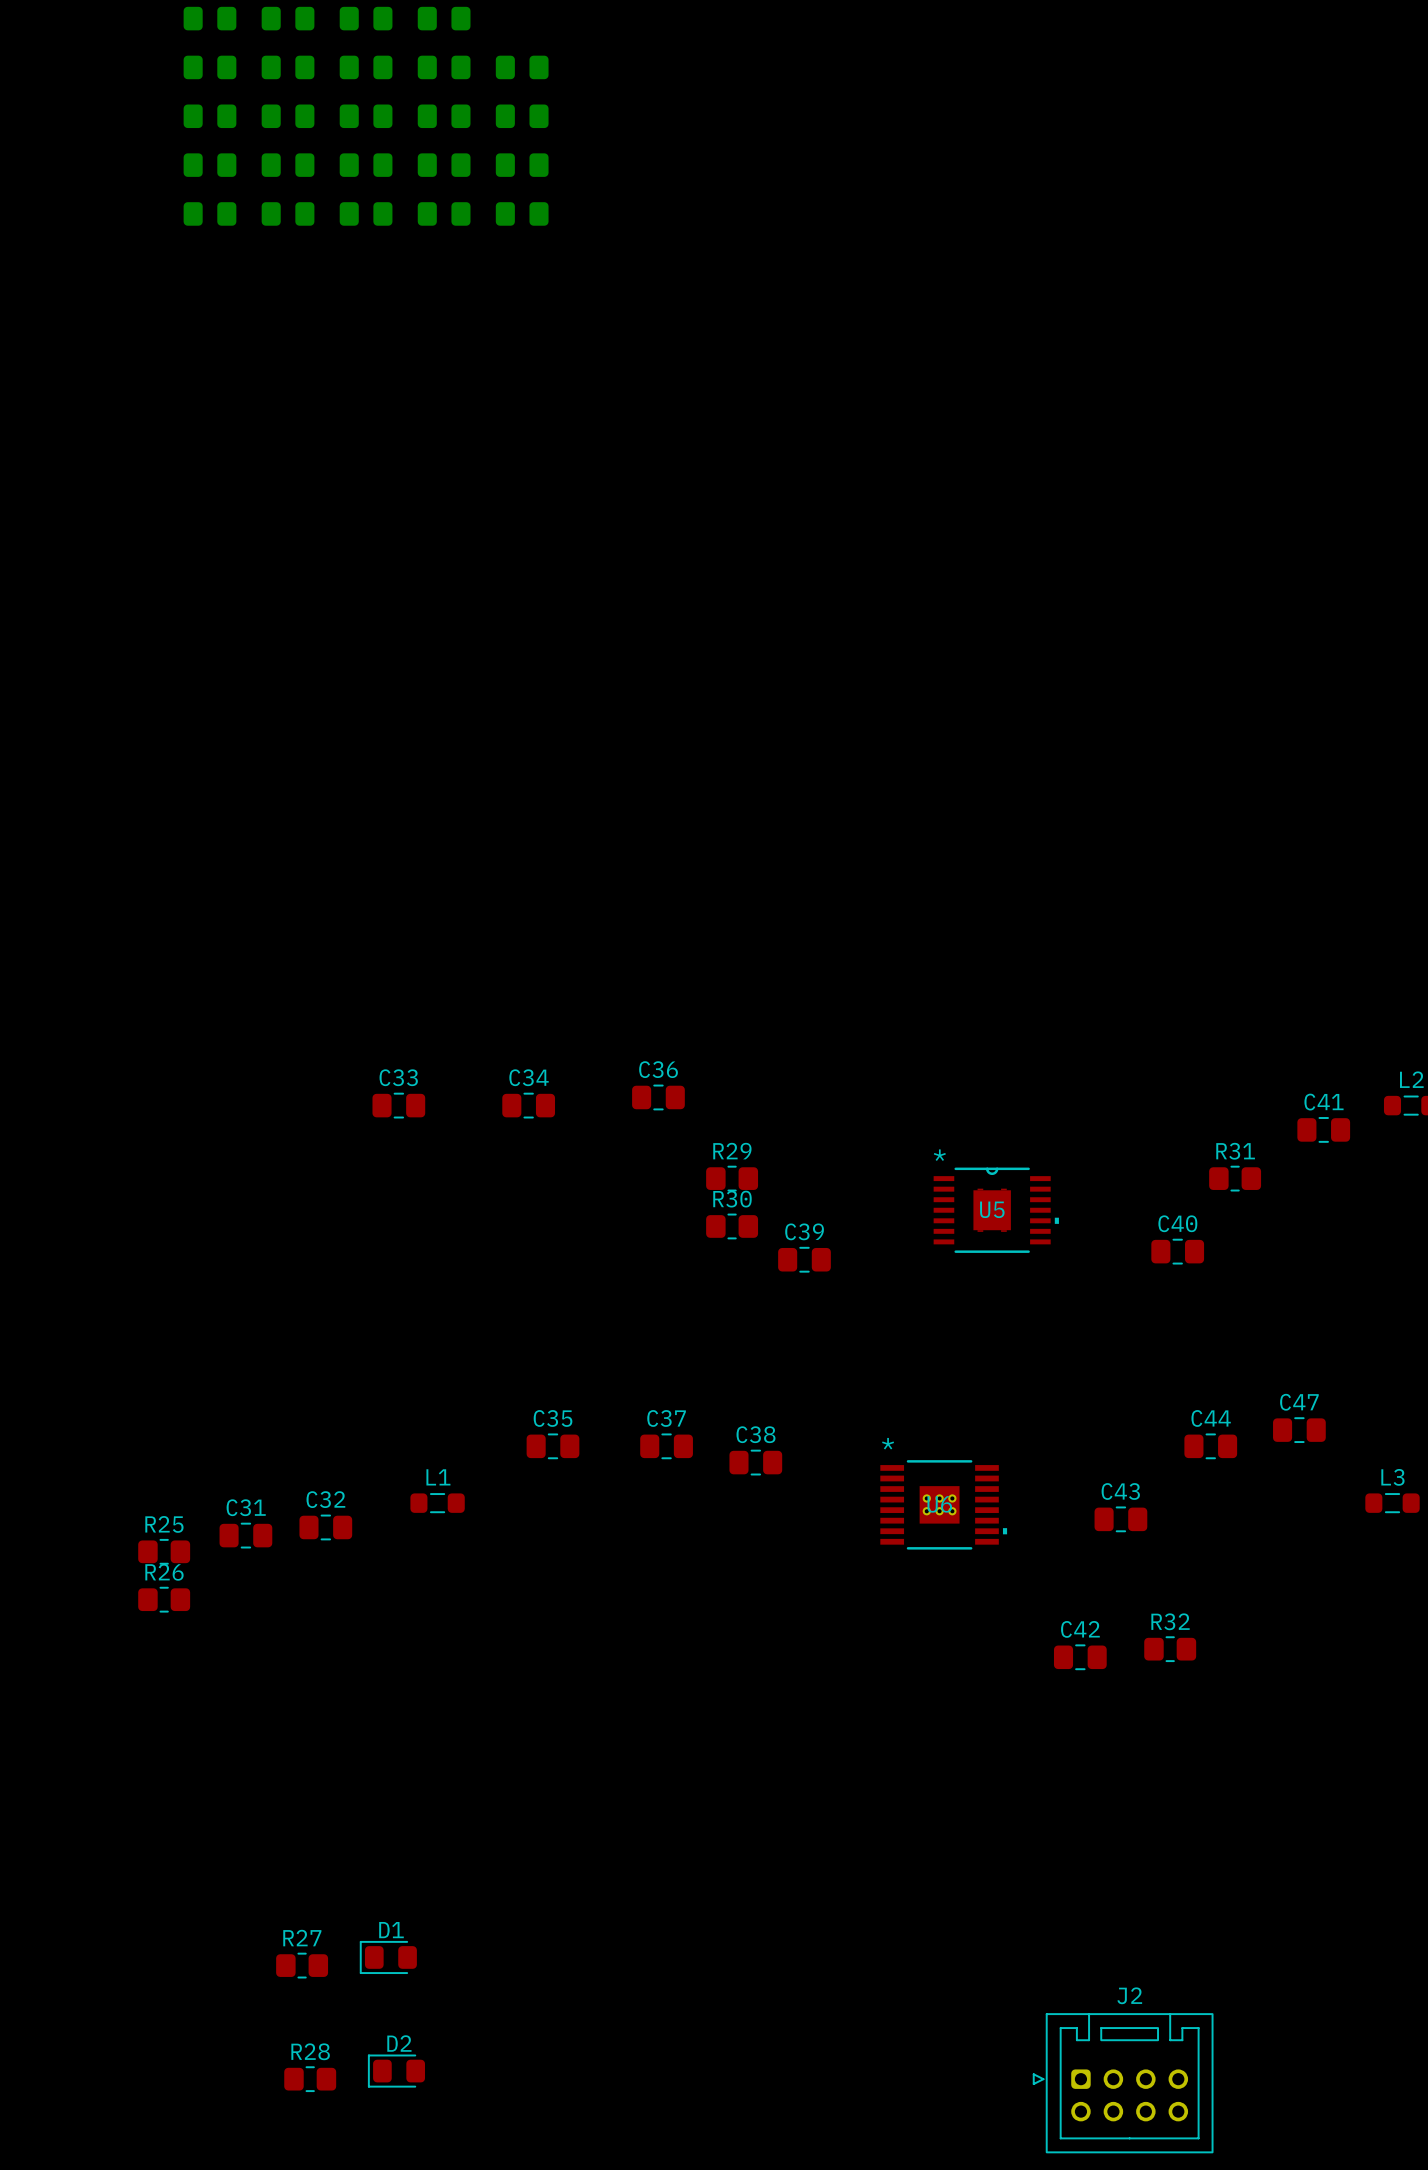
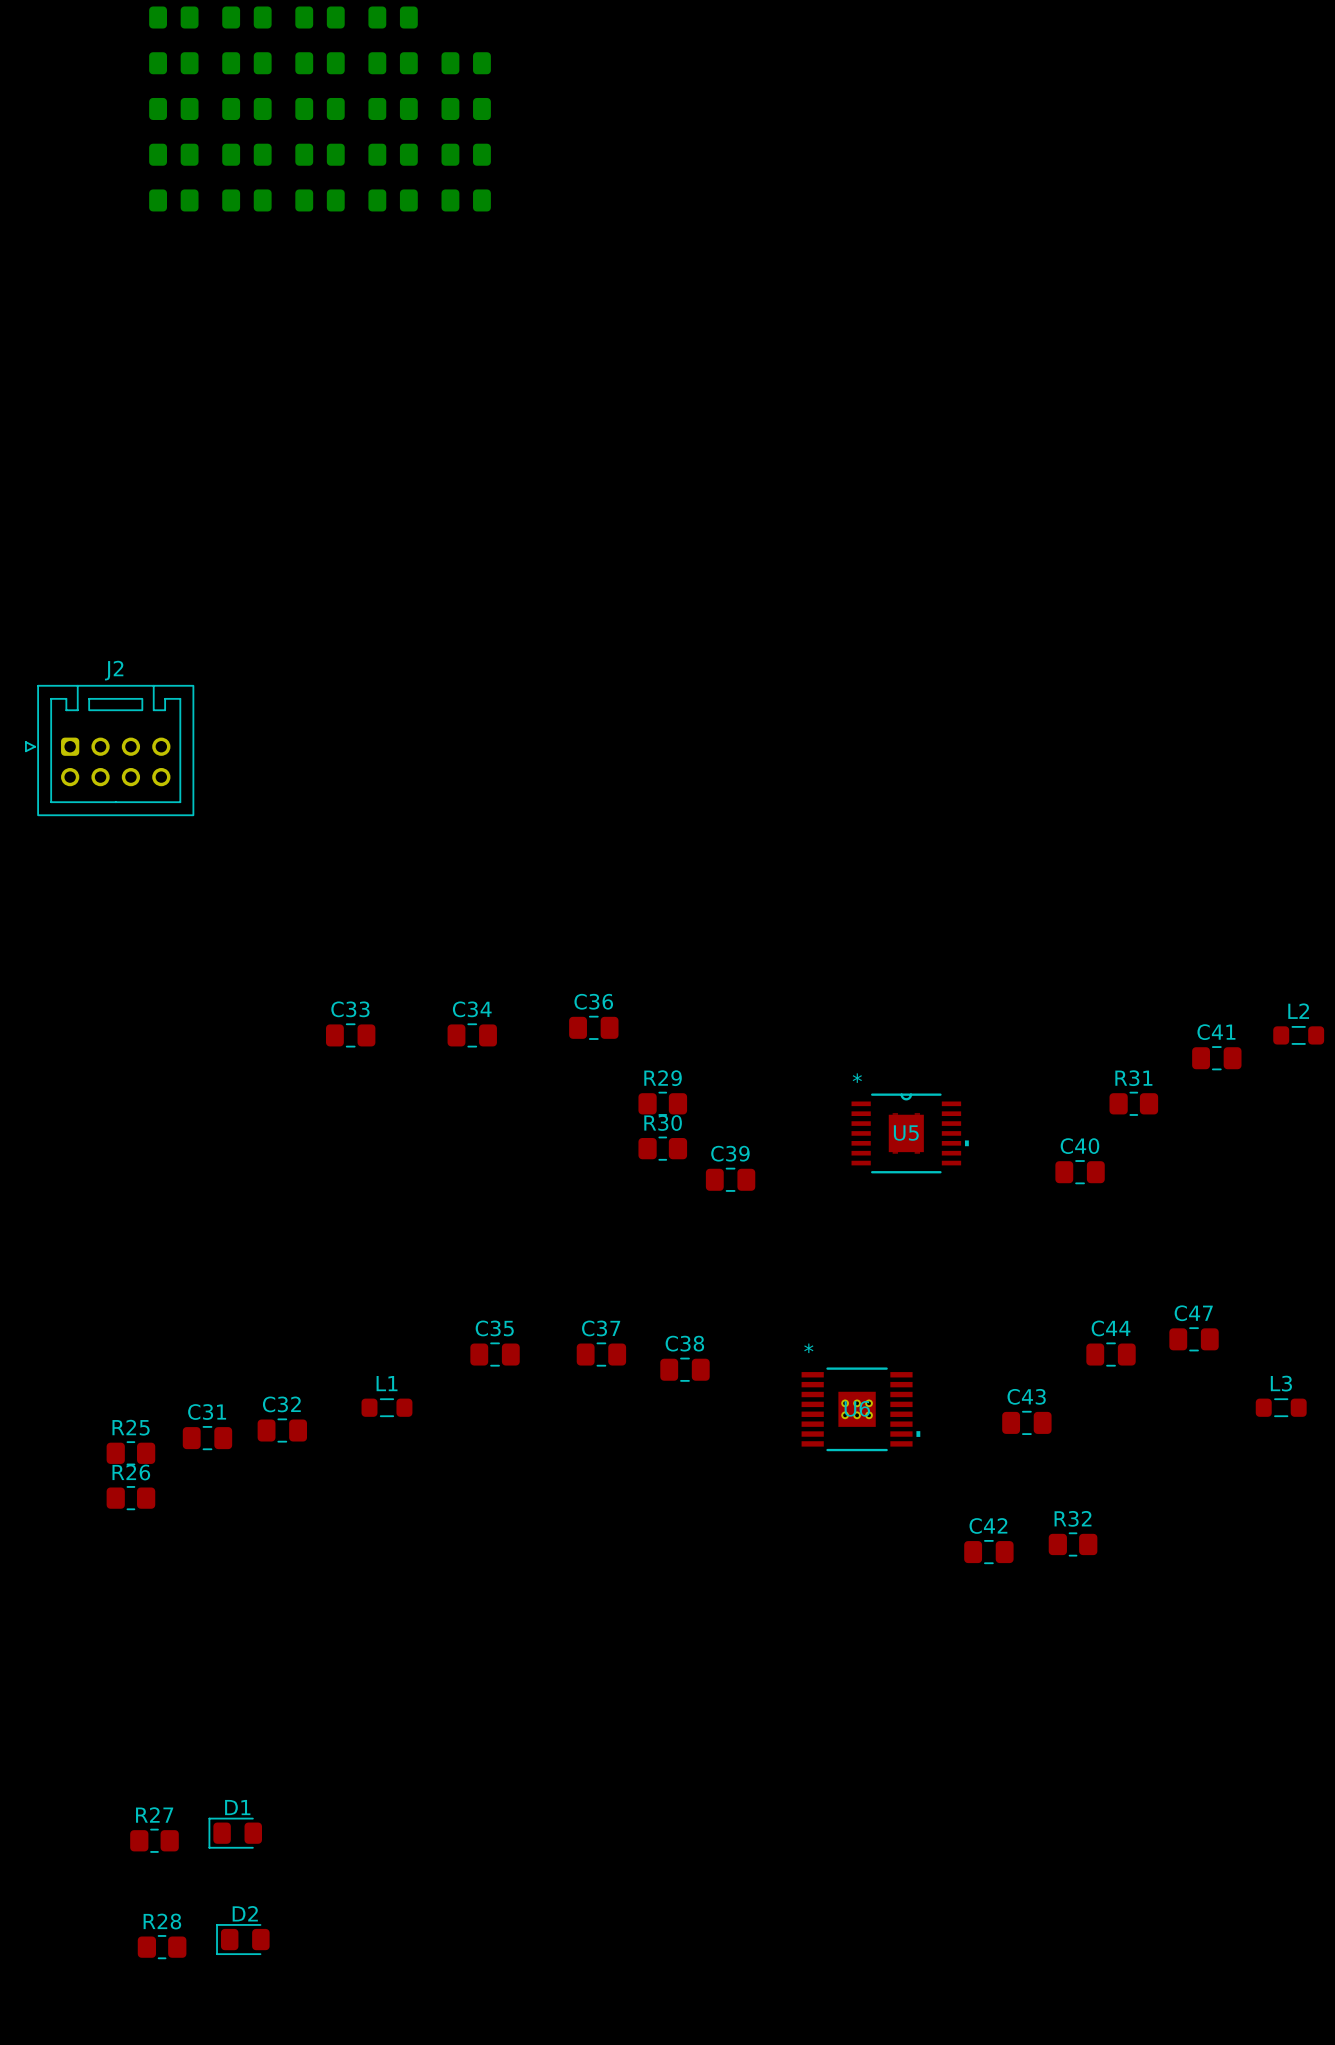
D1 position: (388, 1957) -> (235, 1833)
R27 position: (302, 1965) -> (154, 1840)
D2 position: (396, 2071) -> (242, 1939)
R28 position: (310, 2079) -> (162, 1947)
J2 position: (1123, 2083) -> (109, 750)

